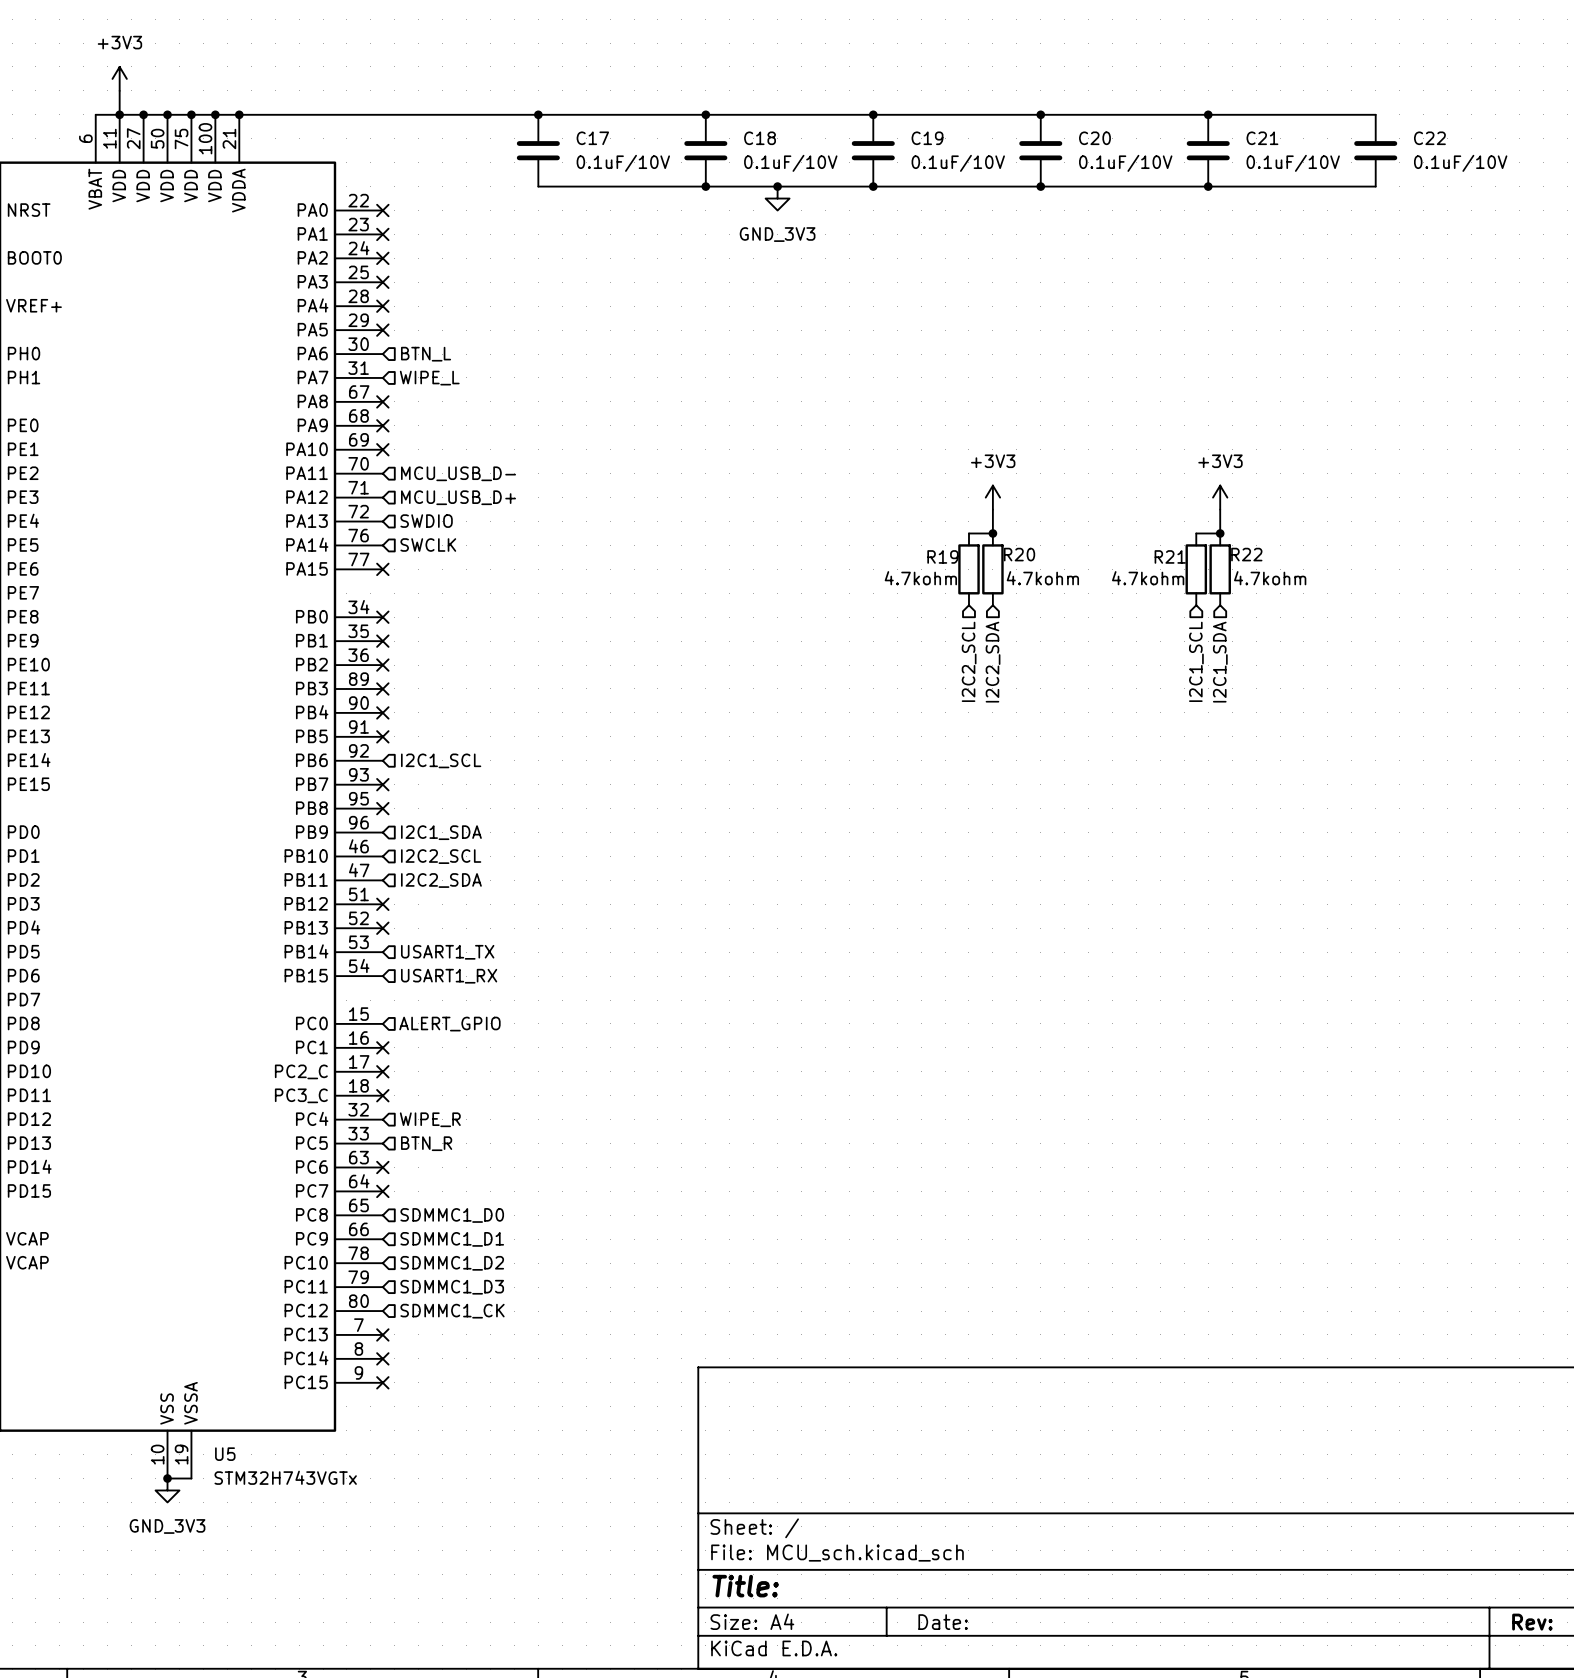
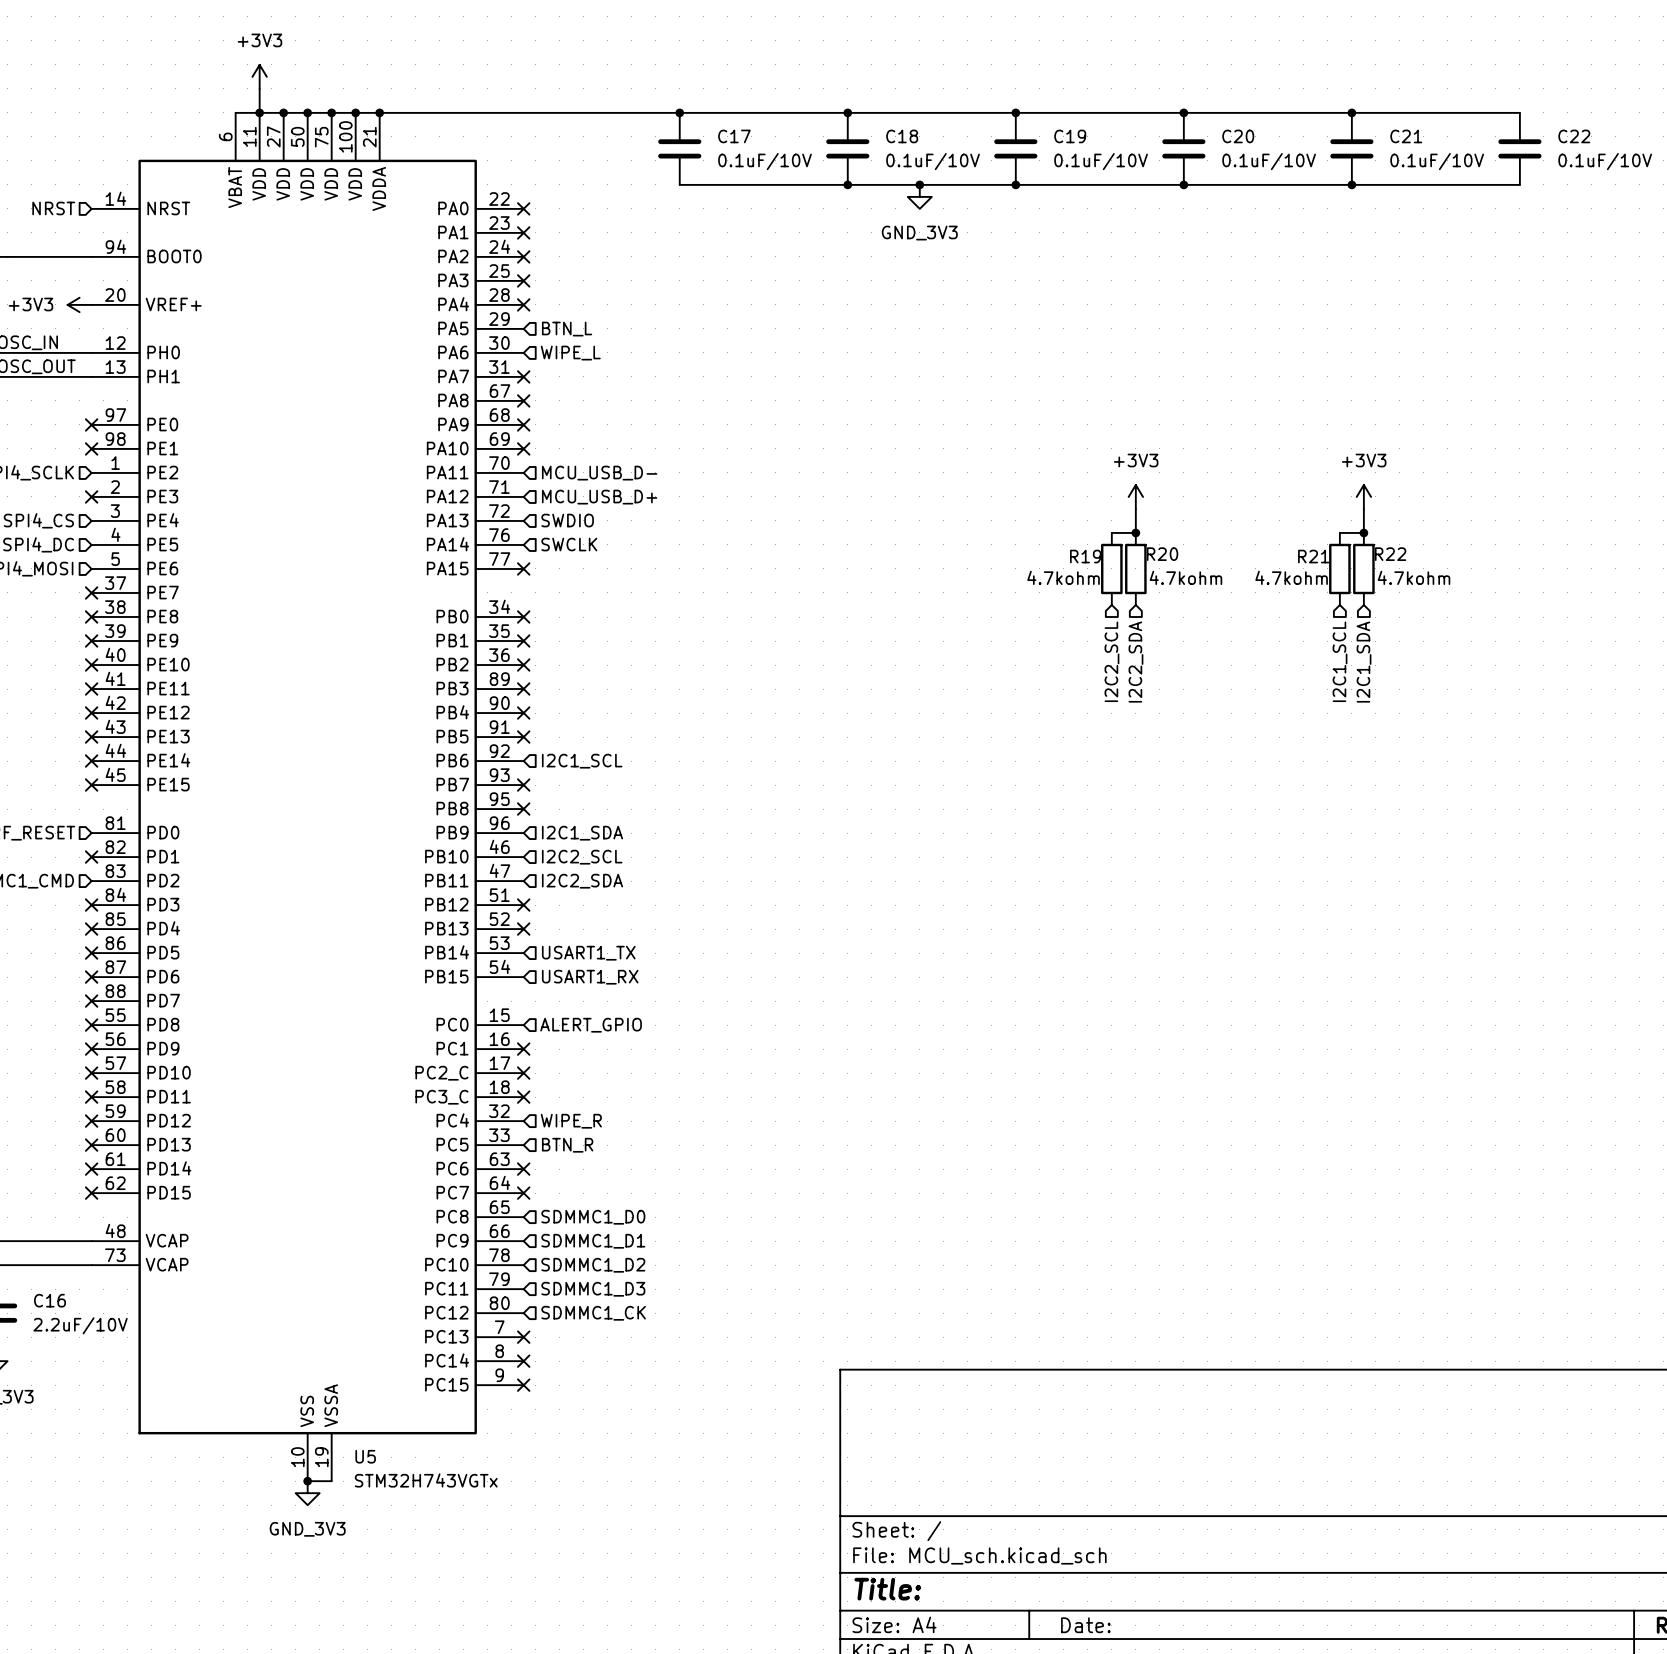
no-connect mark position: (382, 330) -> (523, 376)
hierarchical label: none -> BTN_L (567, 329)
hierarchical label: BTN_L (426, 354) -> WIPE_L (570, 353)
hierarchical label: WIPE_L (429, 378) -> none

